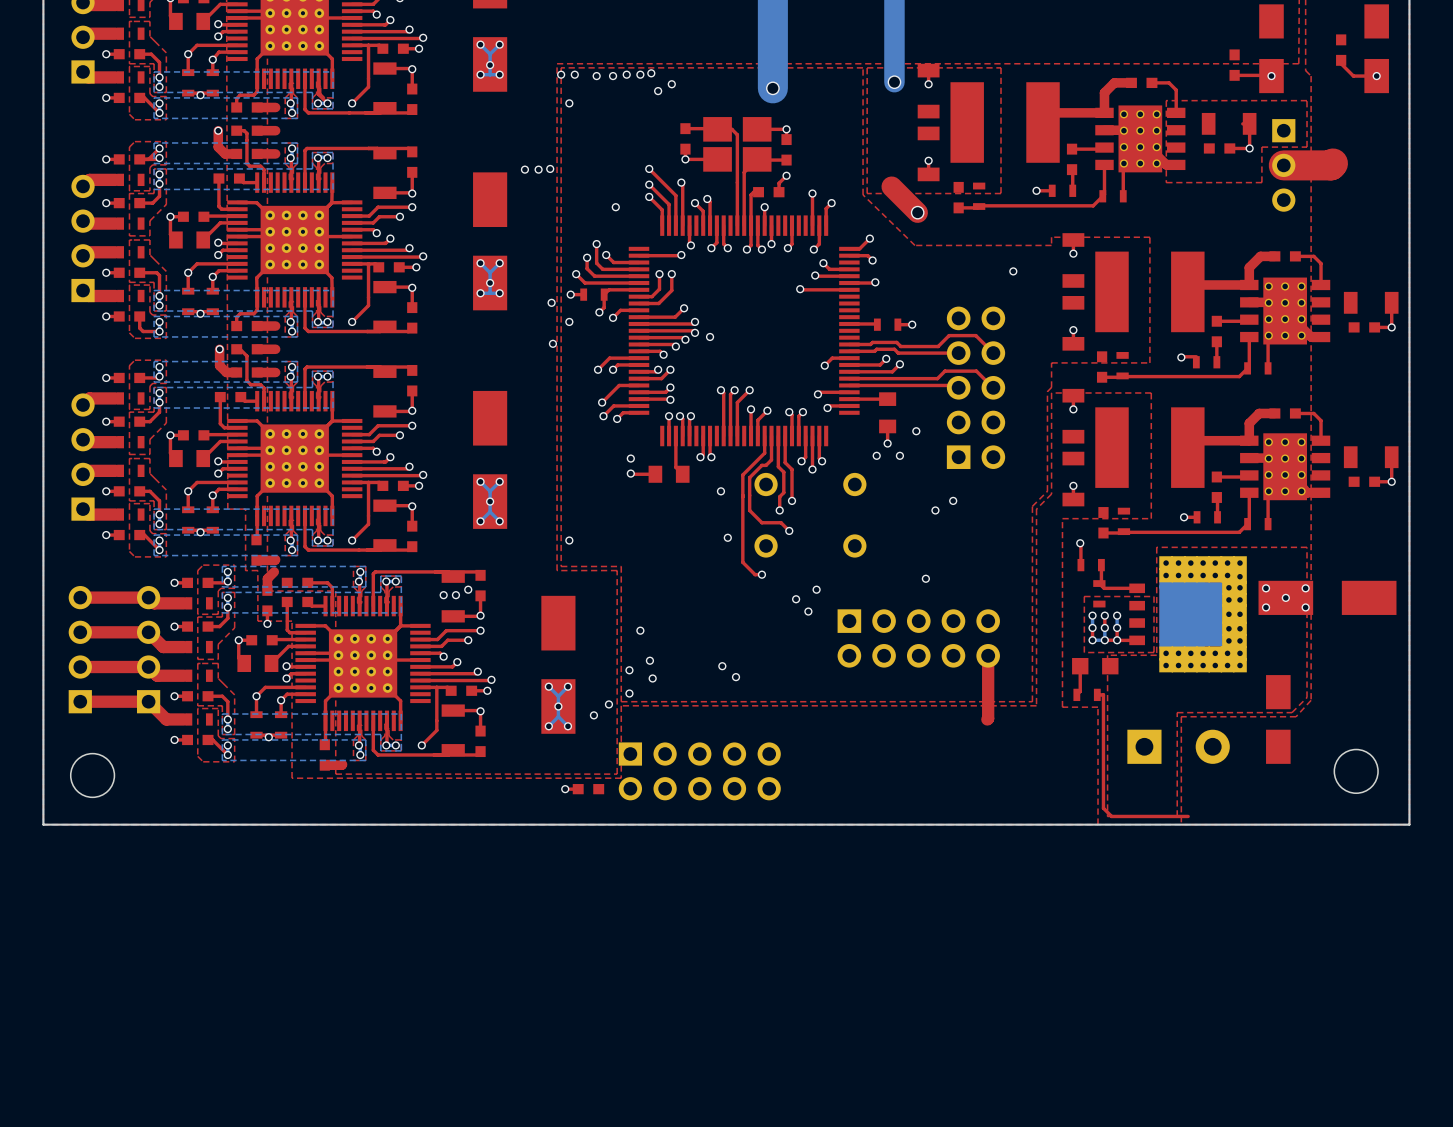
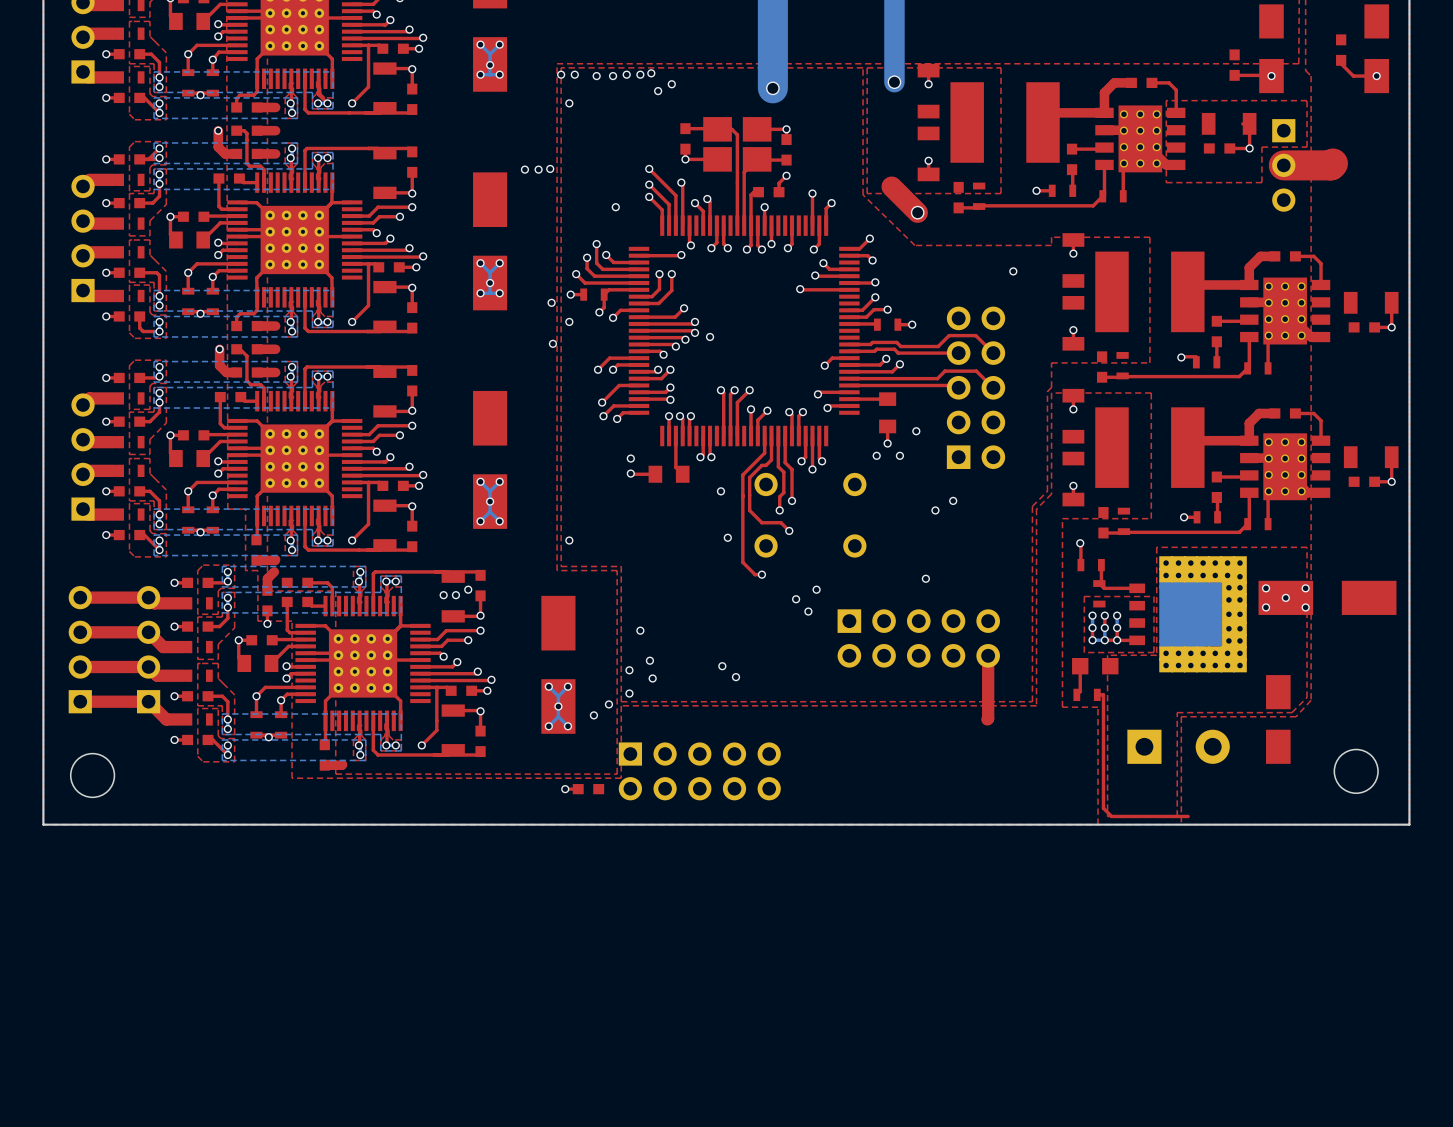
top track: none -> (875, 297) (862, 310) (849, 310)
via: none -> (875, 297)
top track: none -> (887, 309) (873, 309) (866, 317) (849, 317)
via: none -> (887, 309)

